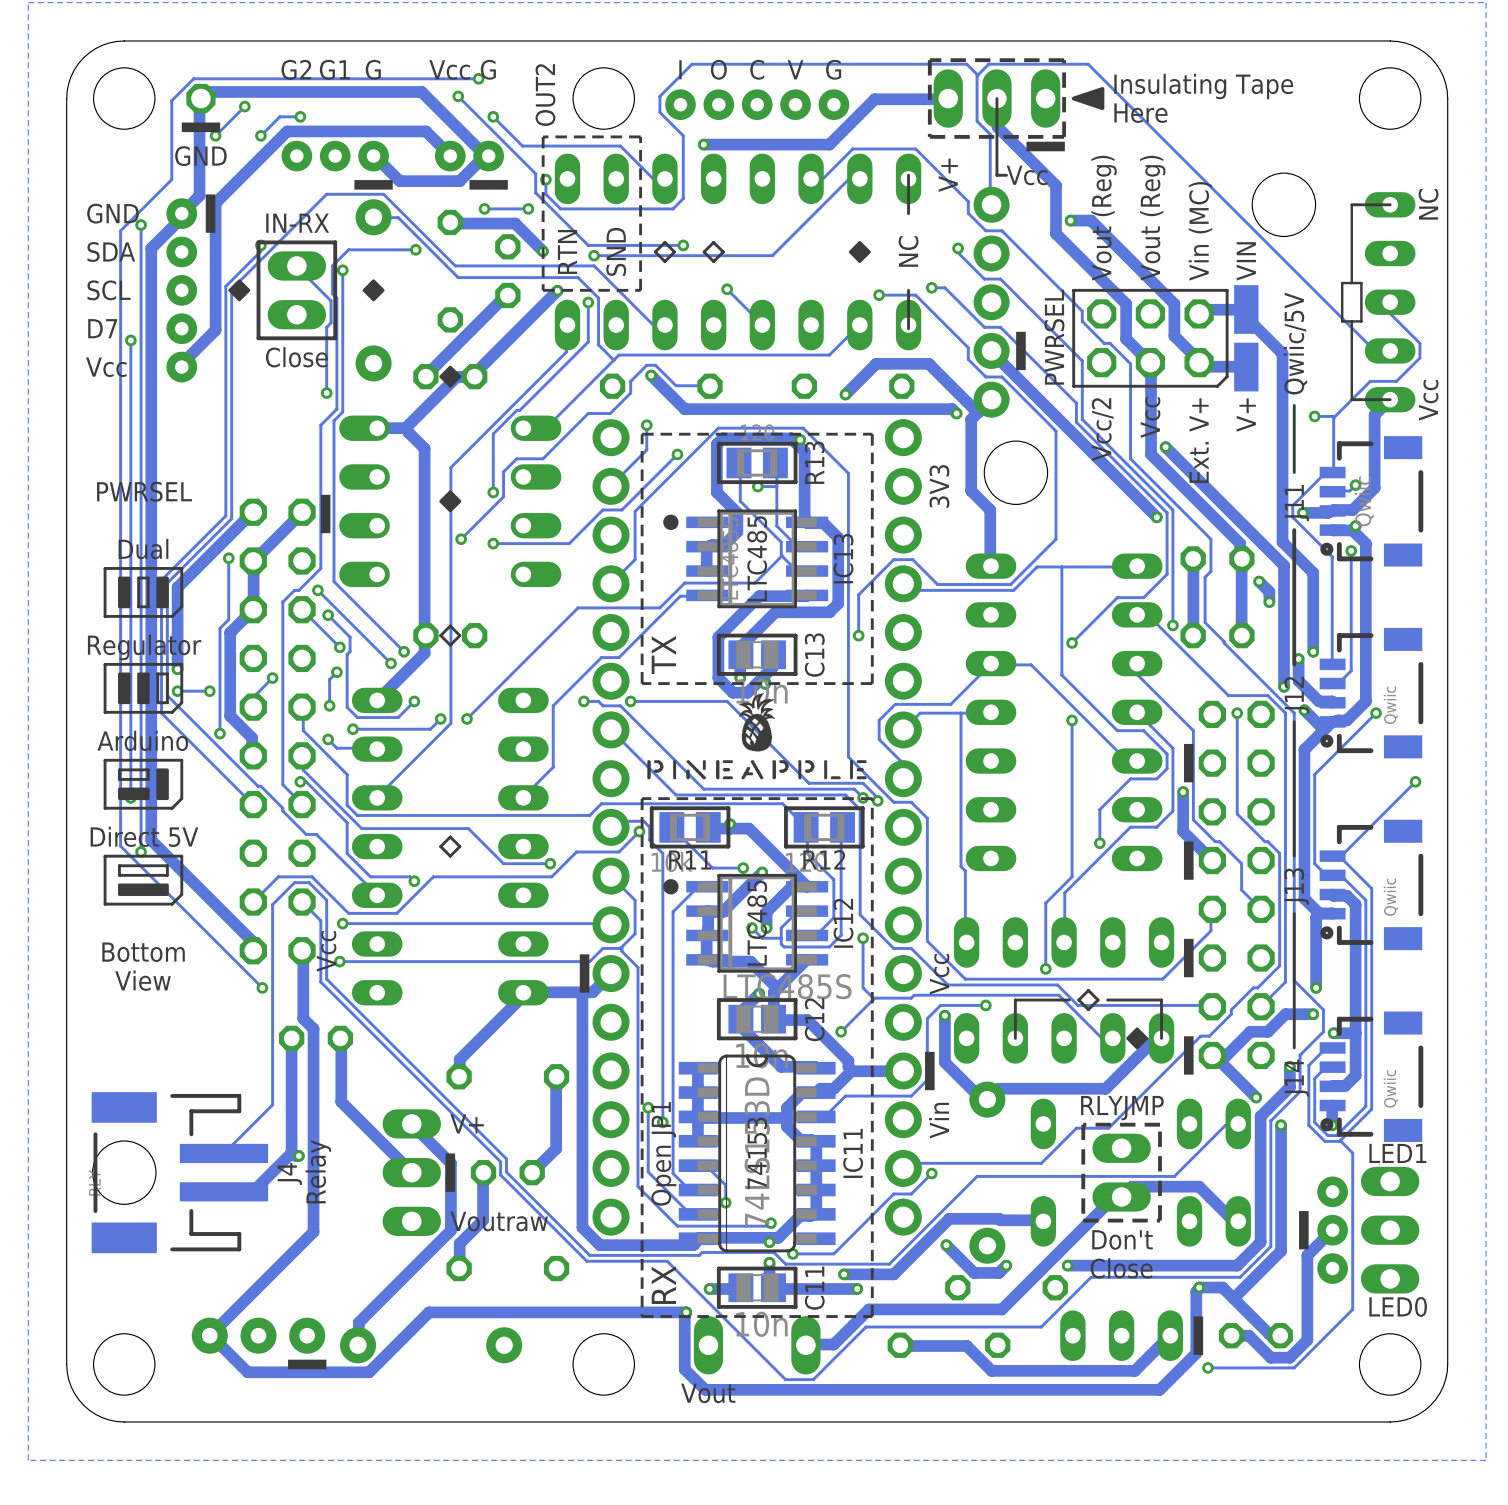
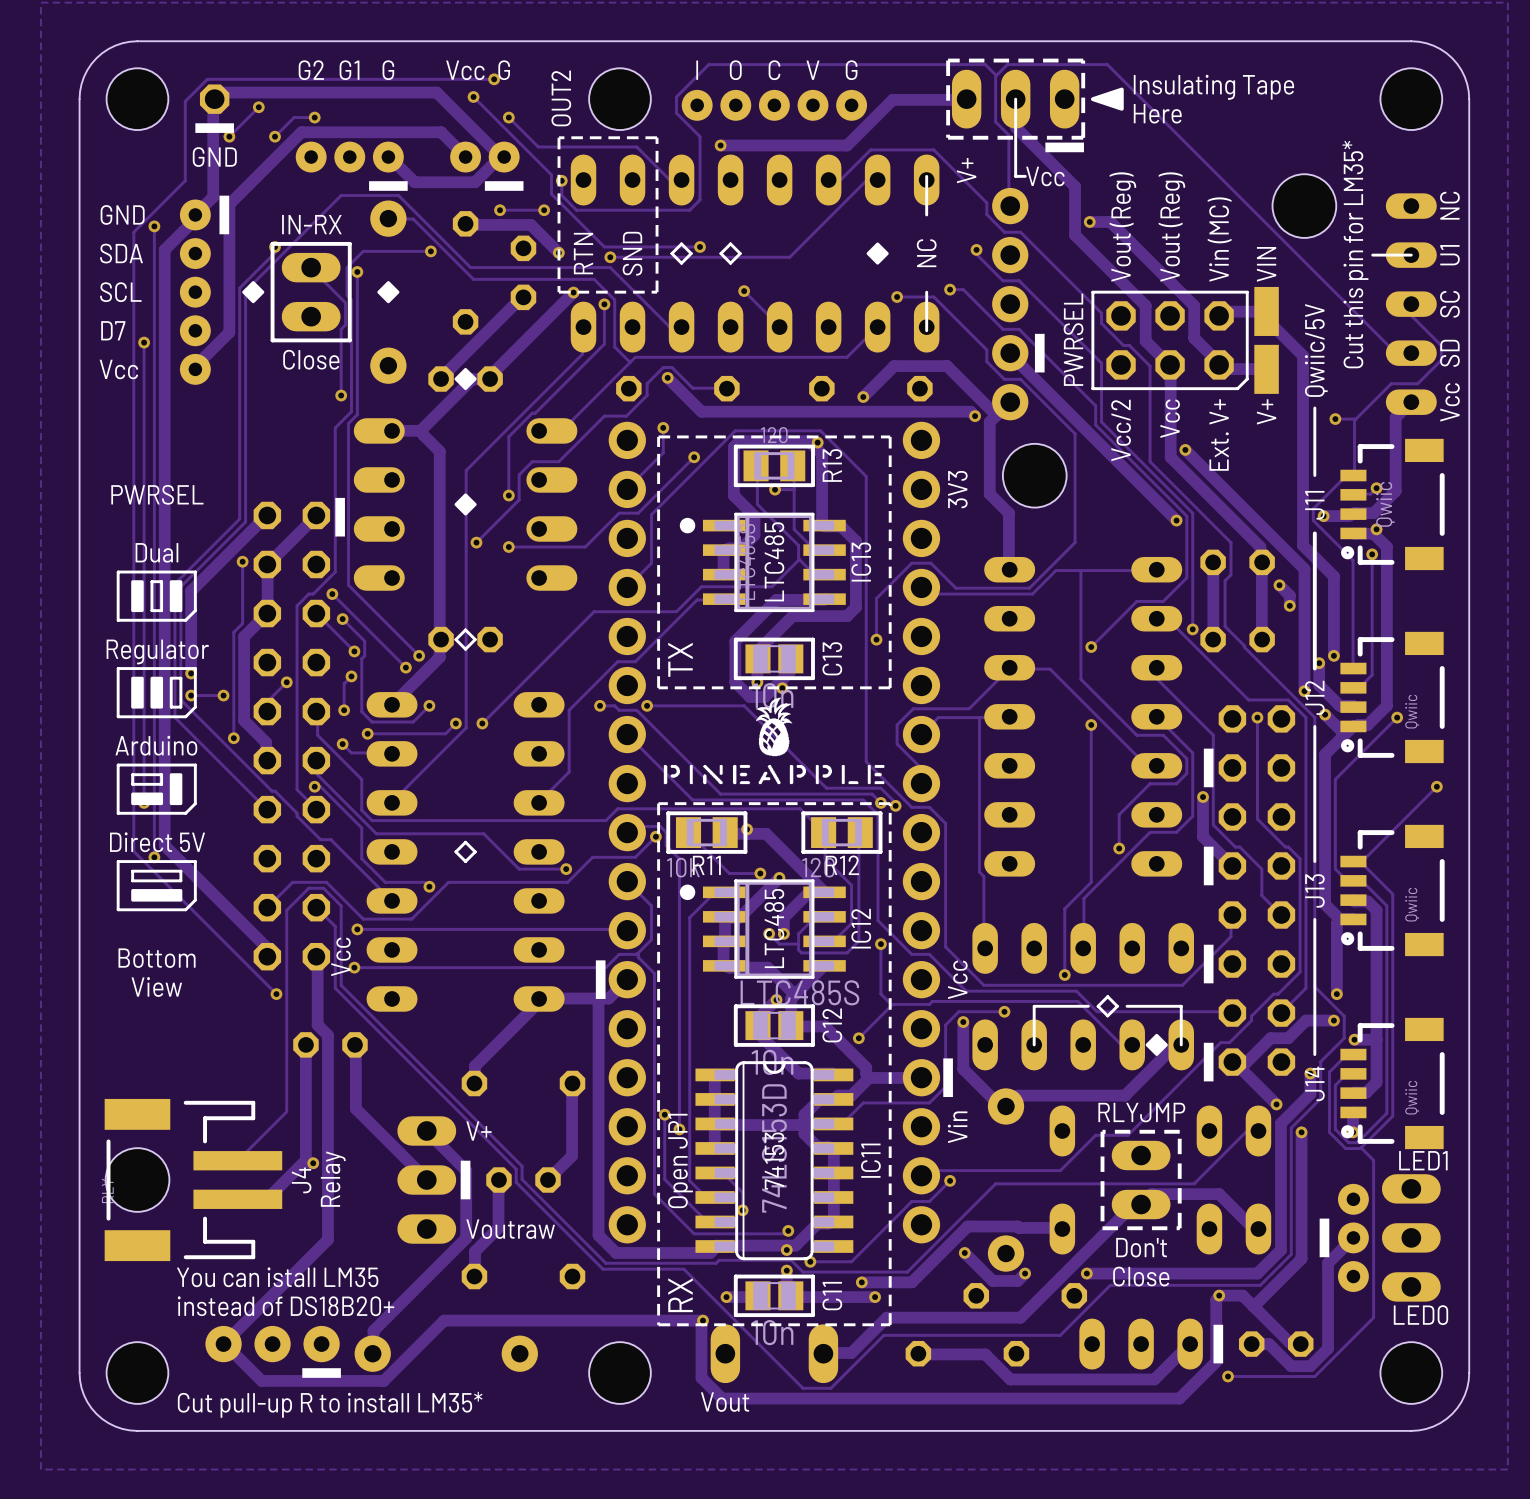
line: (1390, 204) (1351, 204) (1351, 283) -> none
text: none -> Cut this pin for LM35* (1355, 254)
line: none -> (1411, 255) (1372, 255)
text: none -> U1 (1450, 255)
line: (1361, 283) (1342, 283) (1342, 321) (1361, 321) (1361, 283) -> none
text: none -> SC (1449, 304)
line: (1351, 321) (1351, 399) (1390, 399) -> none
text: none -> SD (1449, 353)
text: none -> You can istall LM35 (277, 1277)
text: none -> instead of DS18B20+ (286, 1306)
text: none -> Cut pull-up R to install LM35* (330, 1404)

